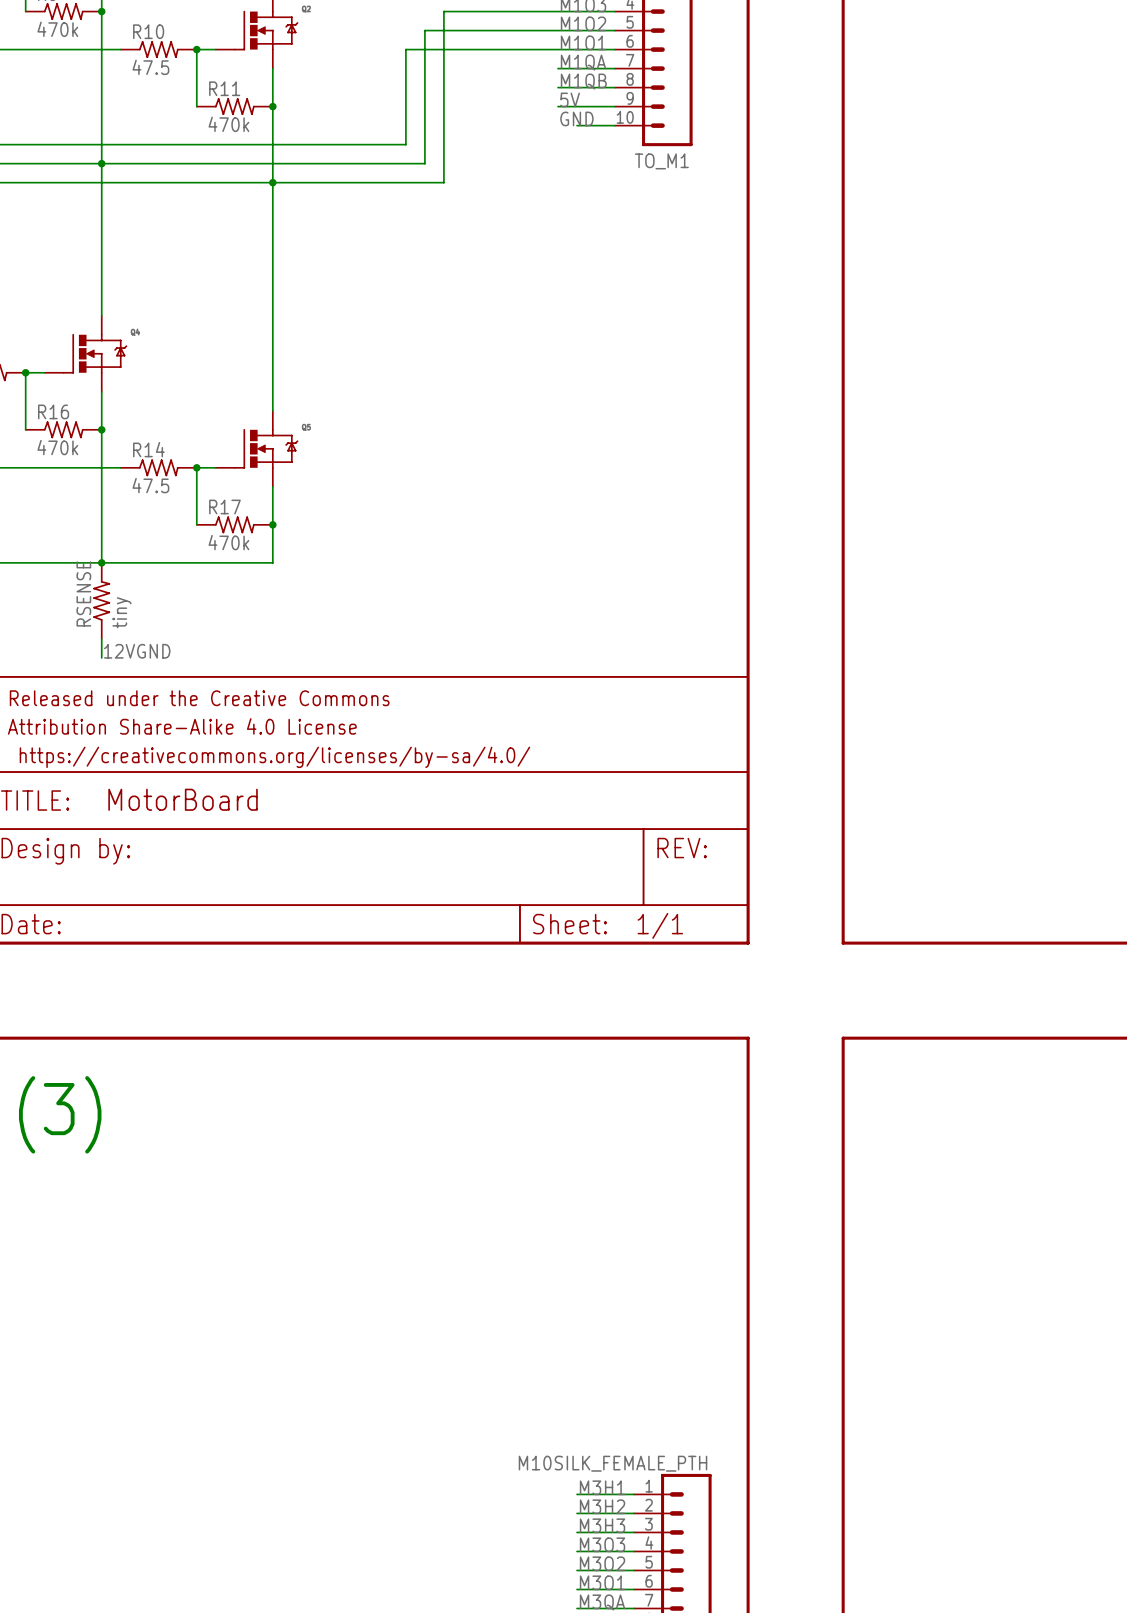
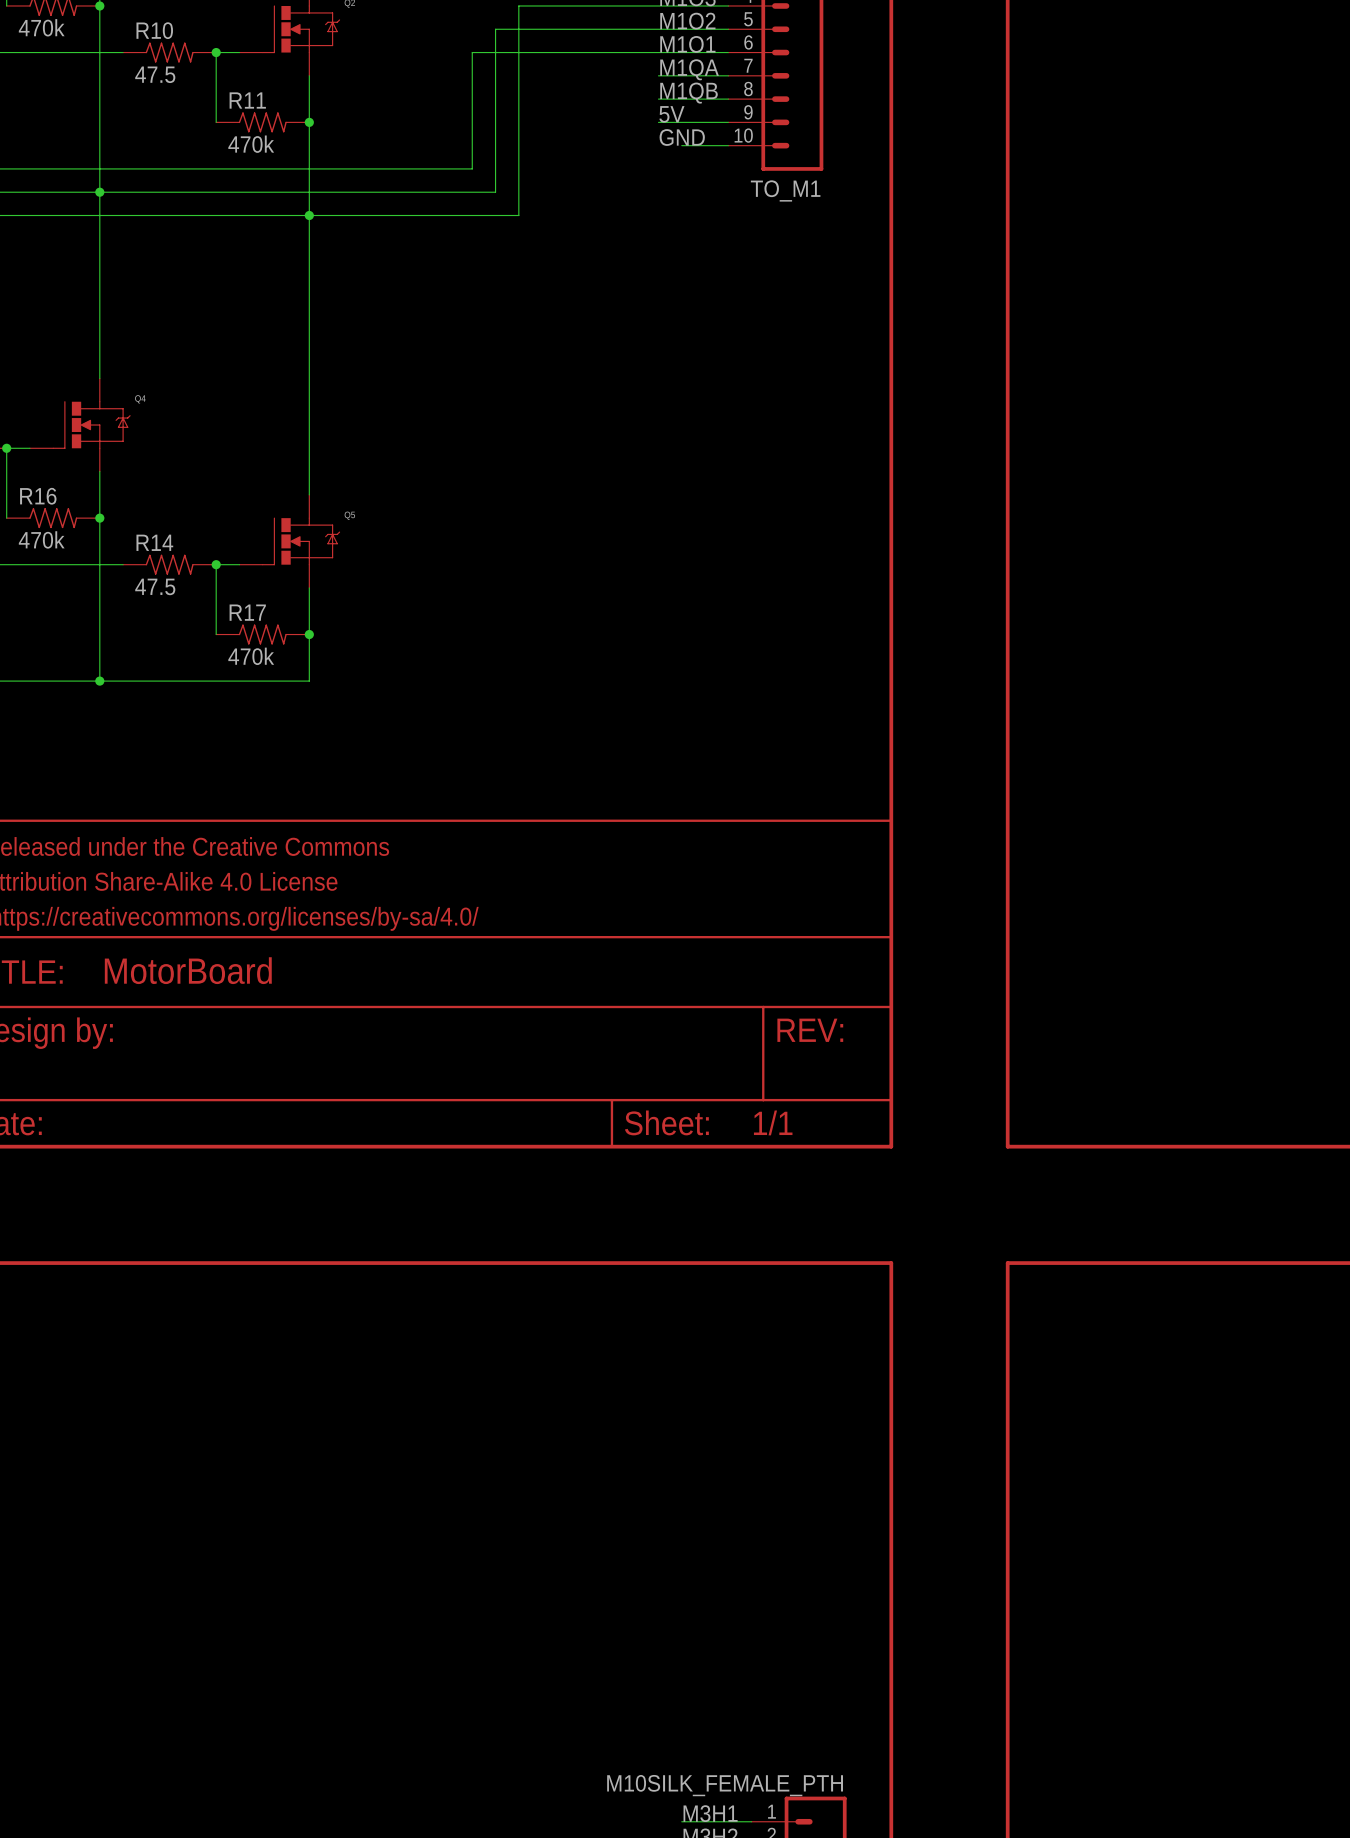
RSENSE: tiny (101, 600) -> none
wire: (101, 638) (101, 657) -> none
label: 12VGND (137, 651) -> none

